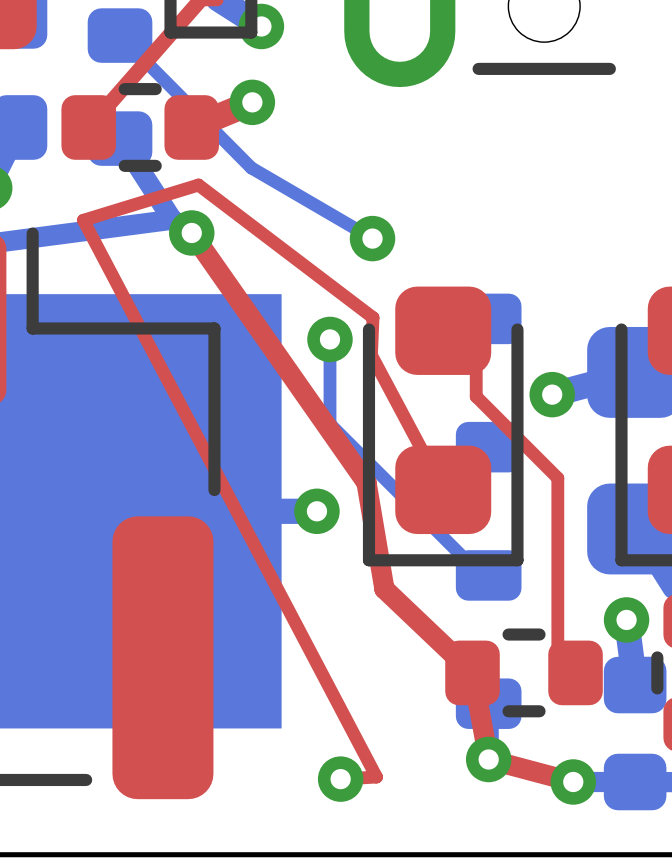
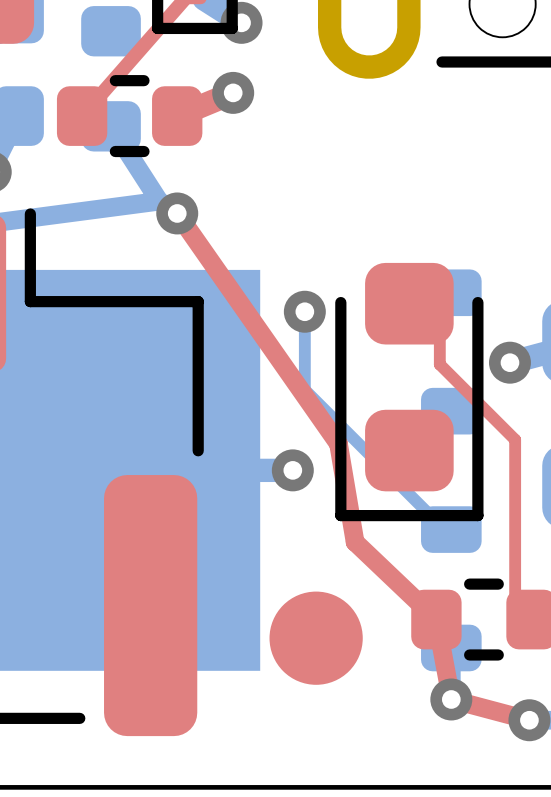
bottom track: (120, 35) (251, 167) (372, 238) -> none
via: (372, 238) -> none
top track: (443, 489) (371, 355) (373, 317) (198, 185) (83, 220) (376, 777) (340, 779) -> none
part: none -> (316, 638)
via: (340, 779) -> none

